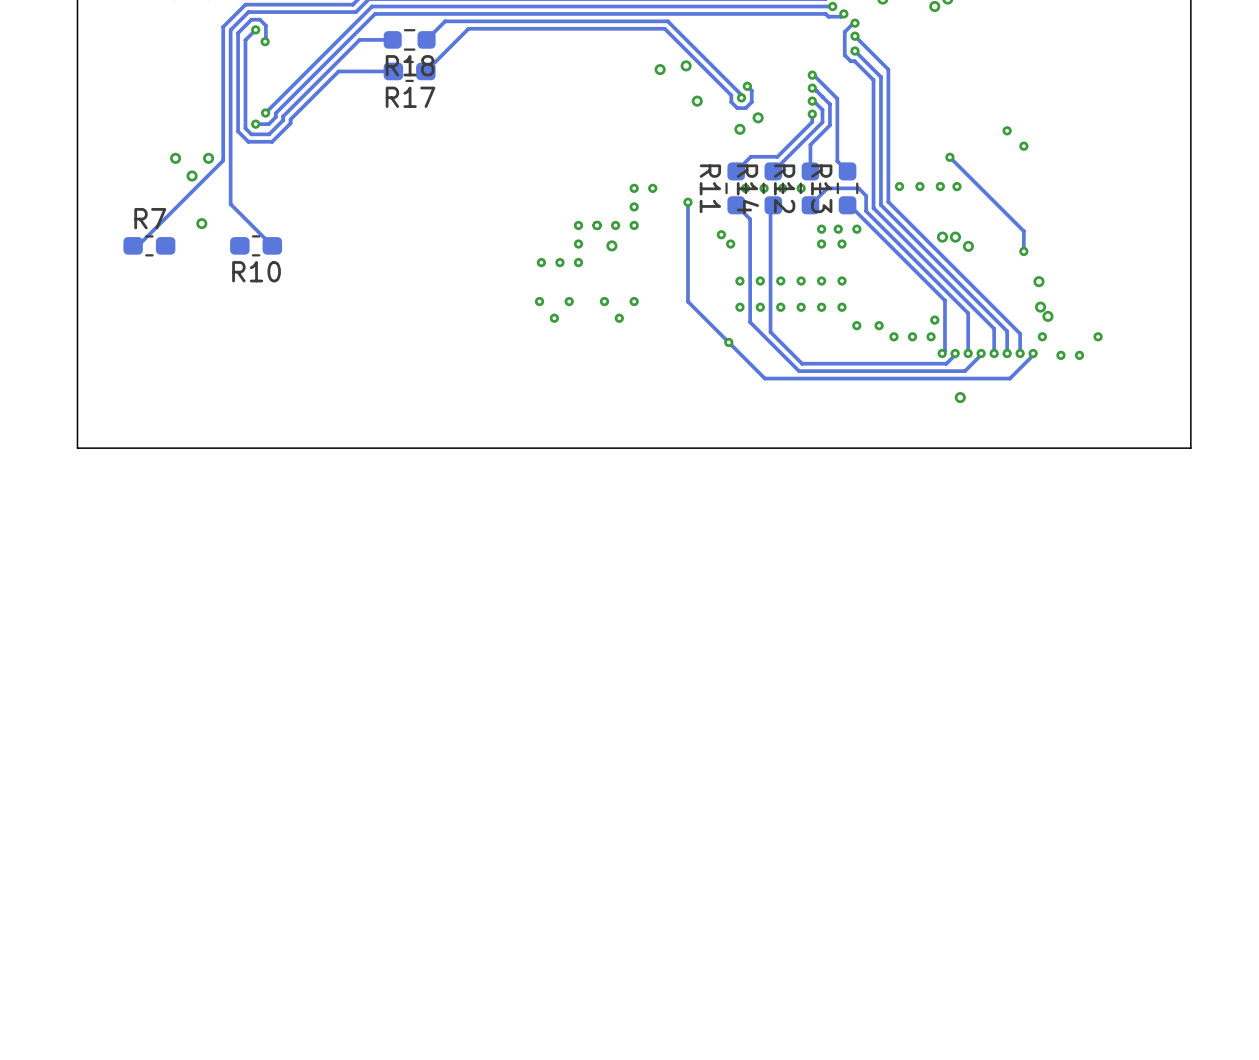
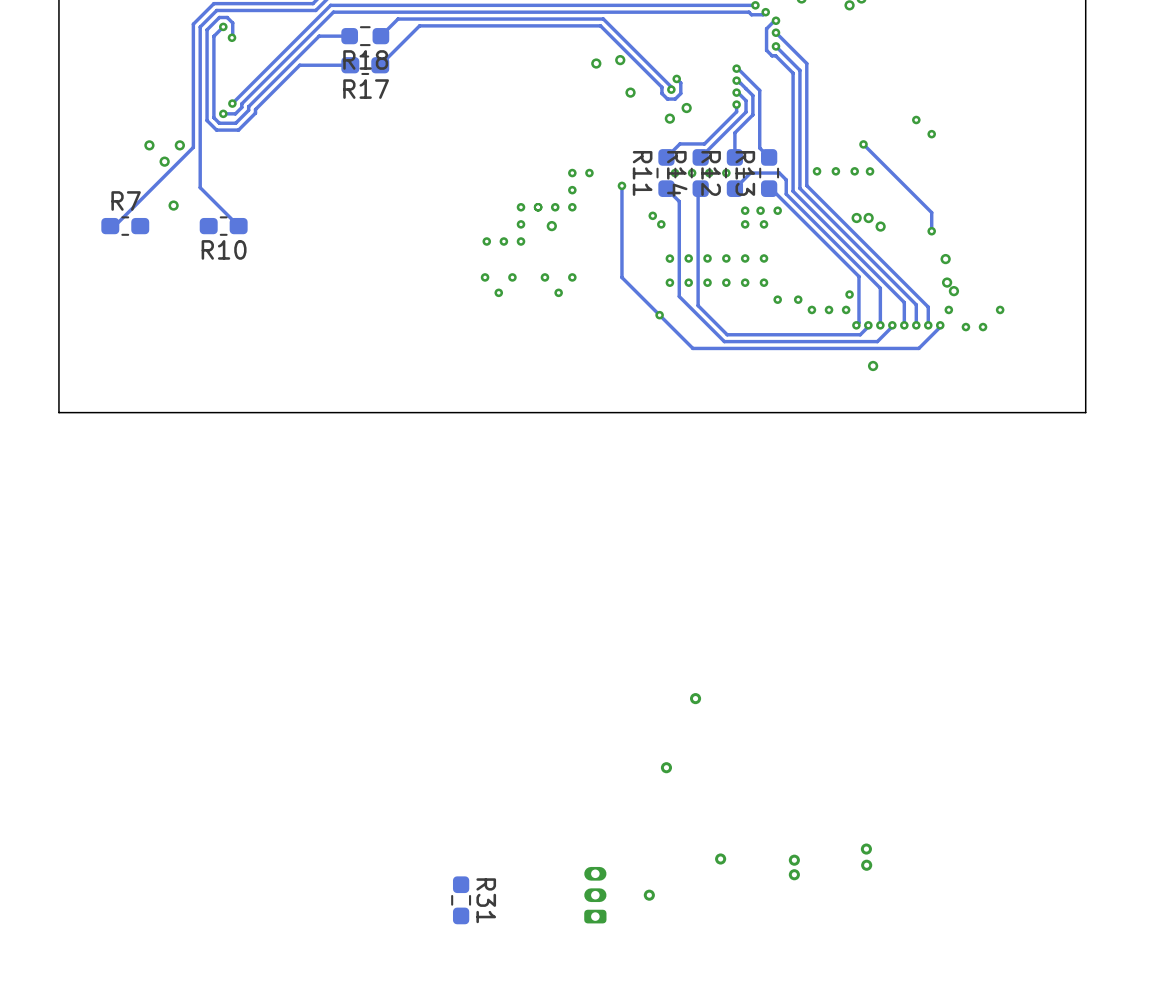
via: none -> (695, 698)
via: none -> (666, 767)
via: none -> (866, 849)
via: none -> (720, 858)
via: none -> (794, 860)
via: none -> (866, 865)
via: none -> (794, 874)
part: none -> (595, 895)
via: none -> (649, 895)
R31: none -> (461, 900)

